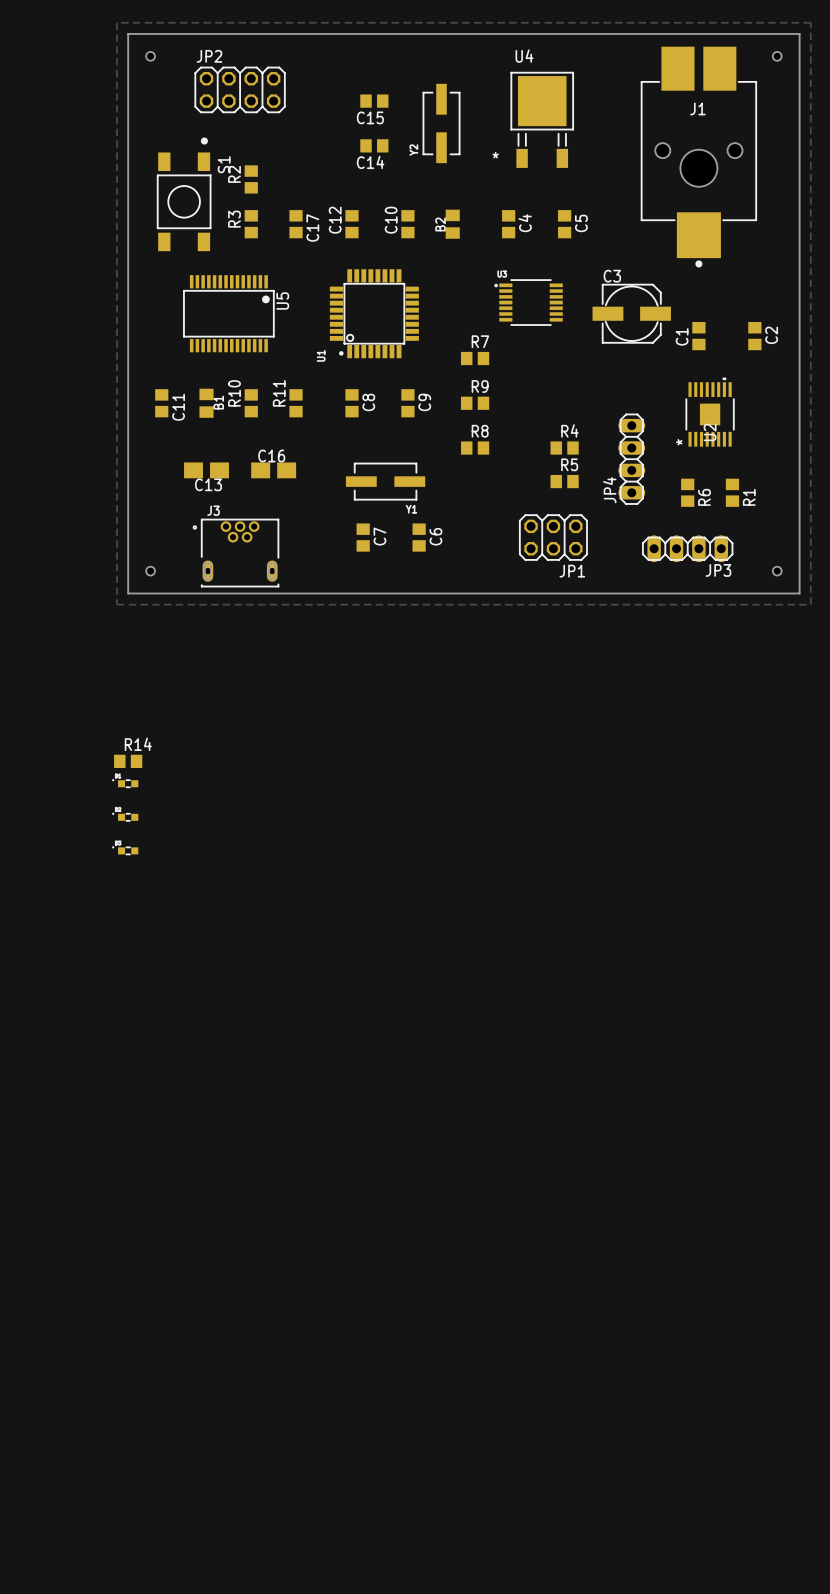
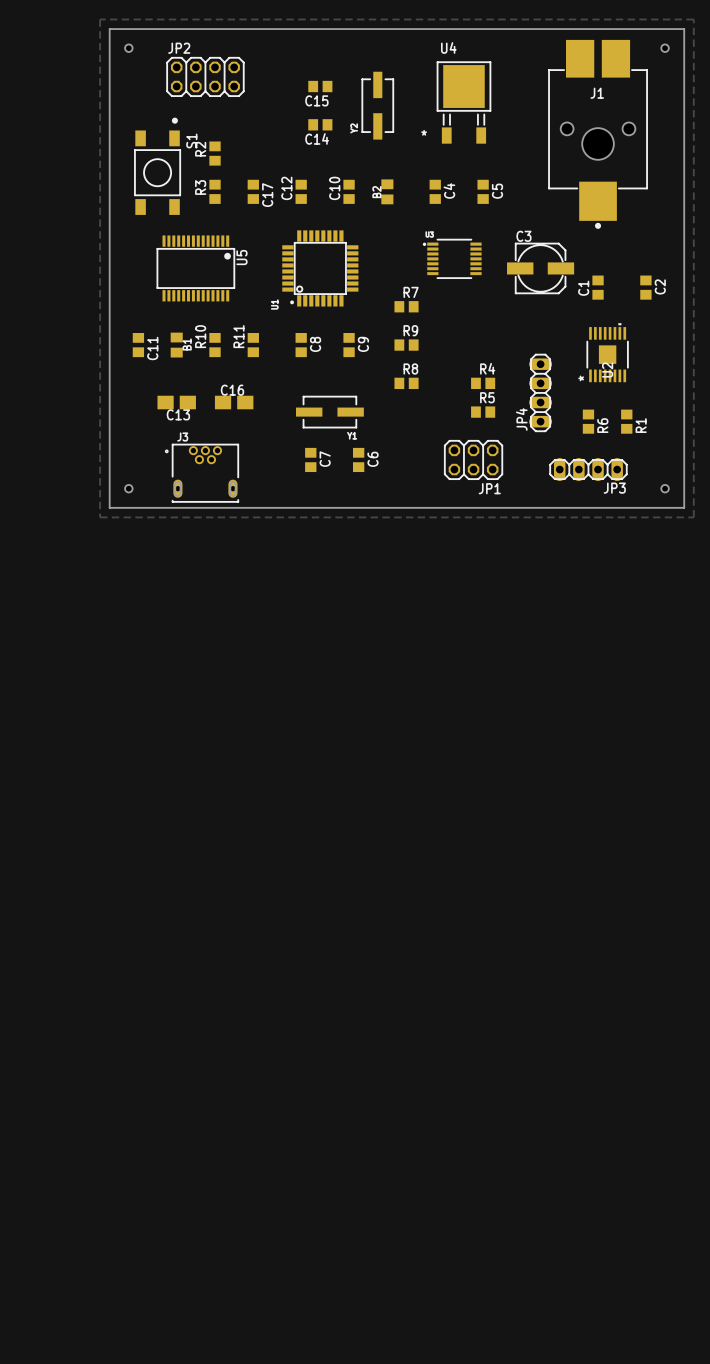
R14: (128, 761) -> none
part: (125, 783) -> none
part: (125, 817) -> none
part: (125, 850) -> none

